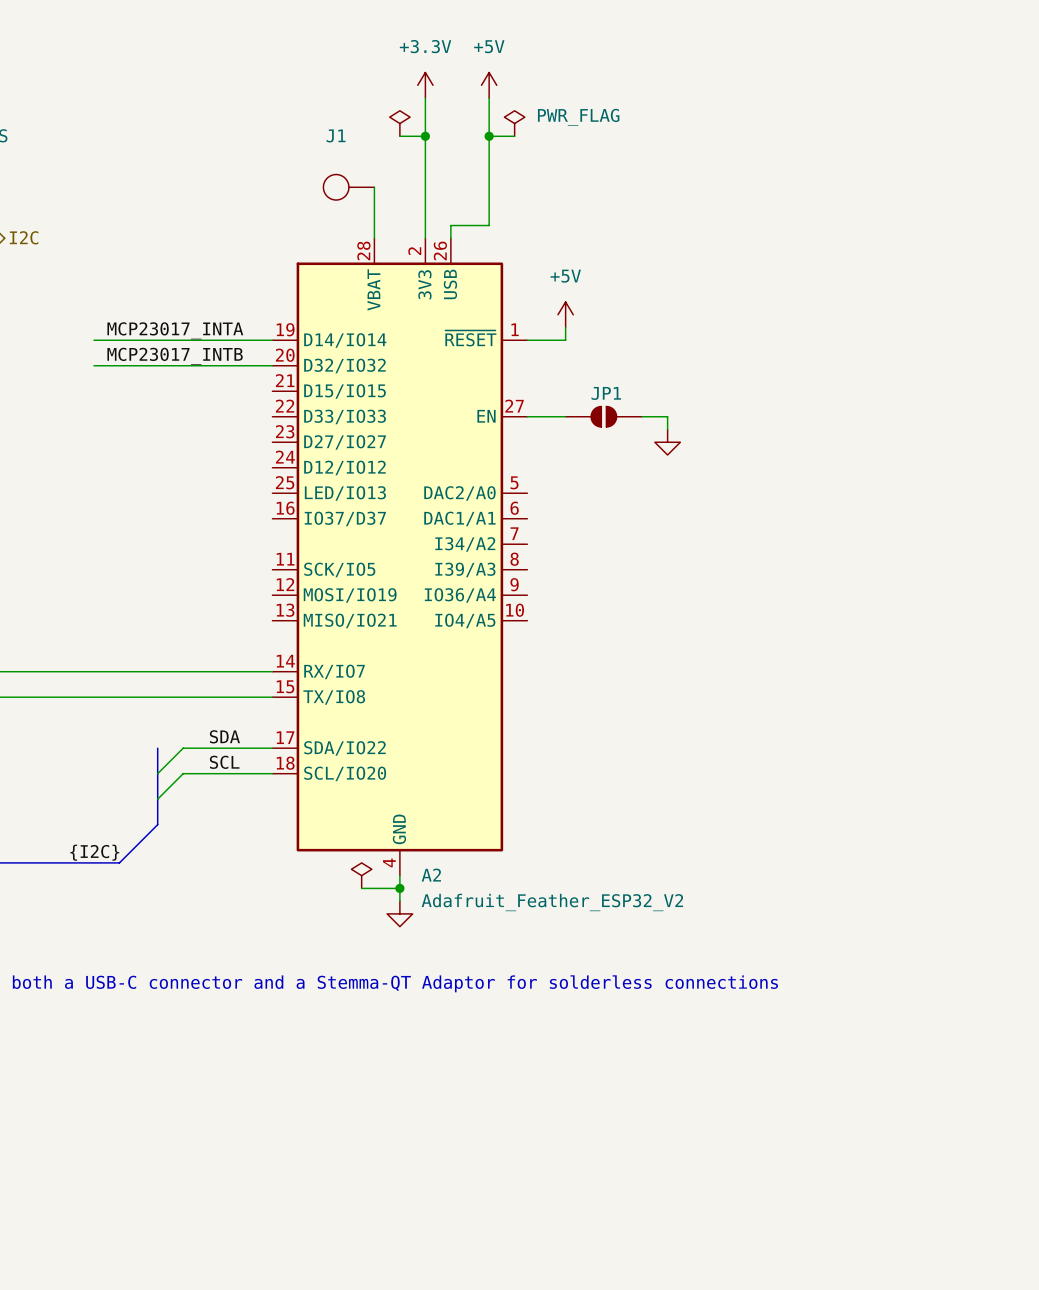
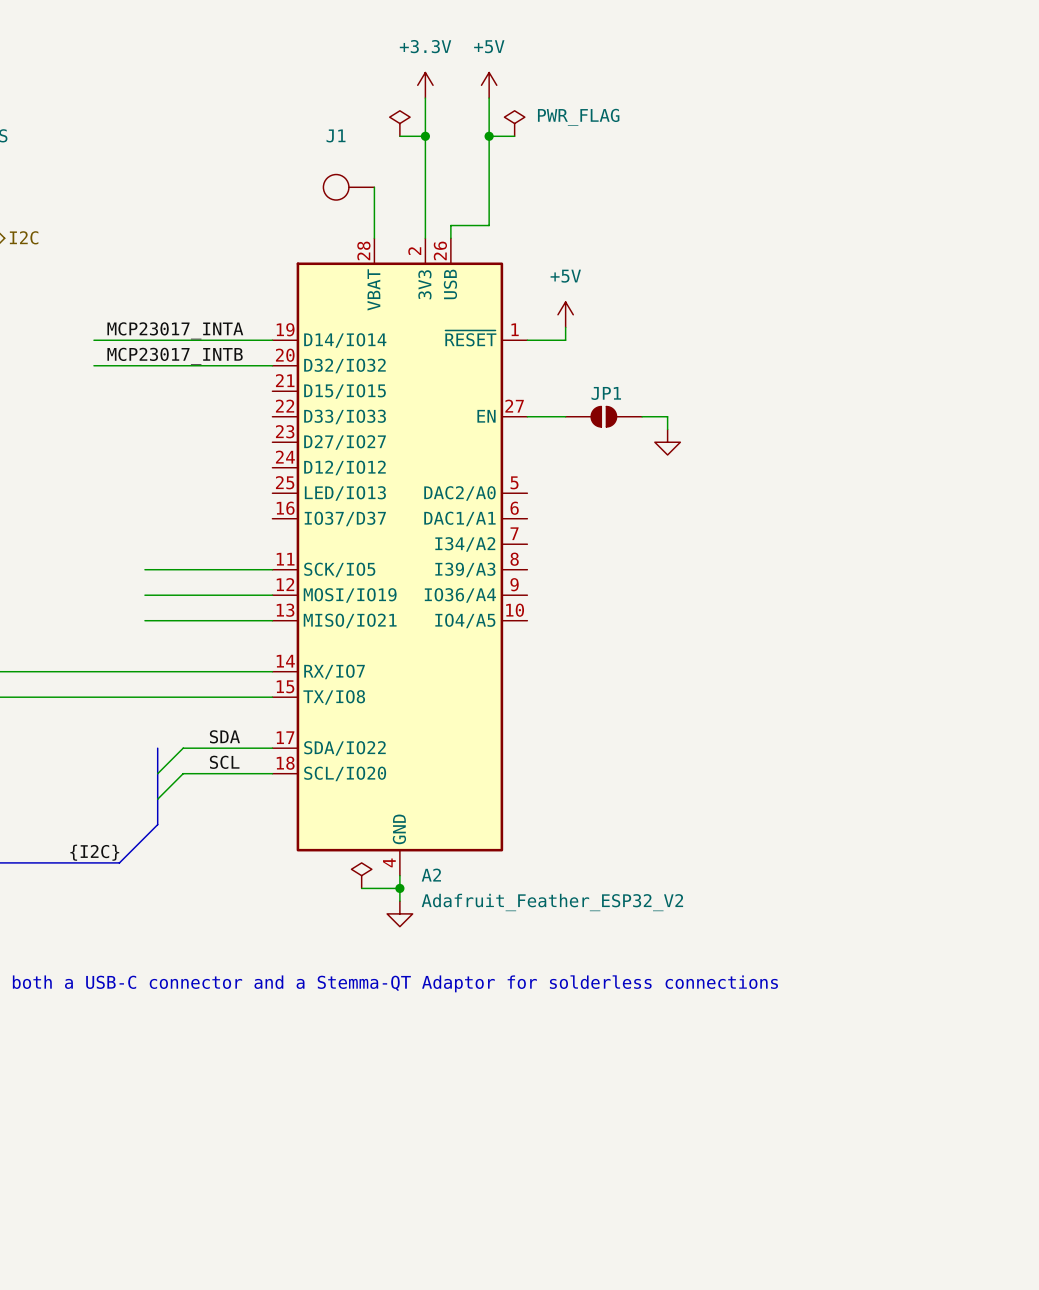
wire: none -> (144, 569) (272, 569)
wire: none -> (144, 595) (272, 595)
wire: none -> (144, 620) (272, 620)

